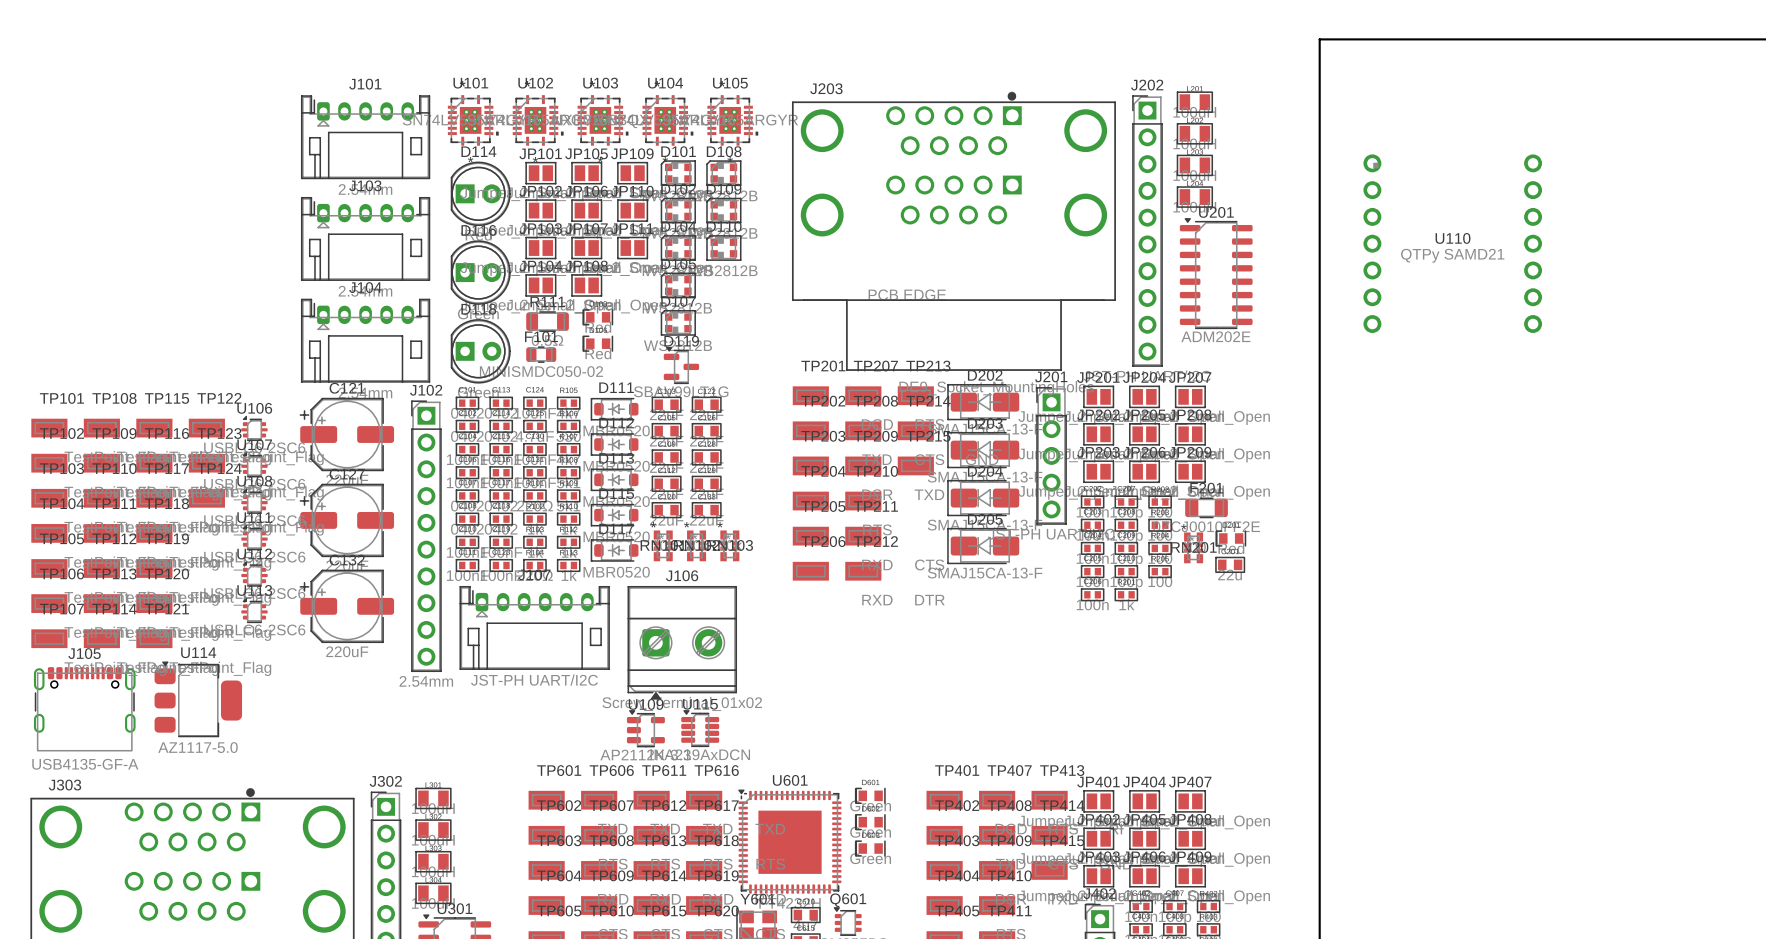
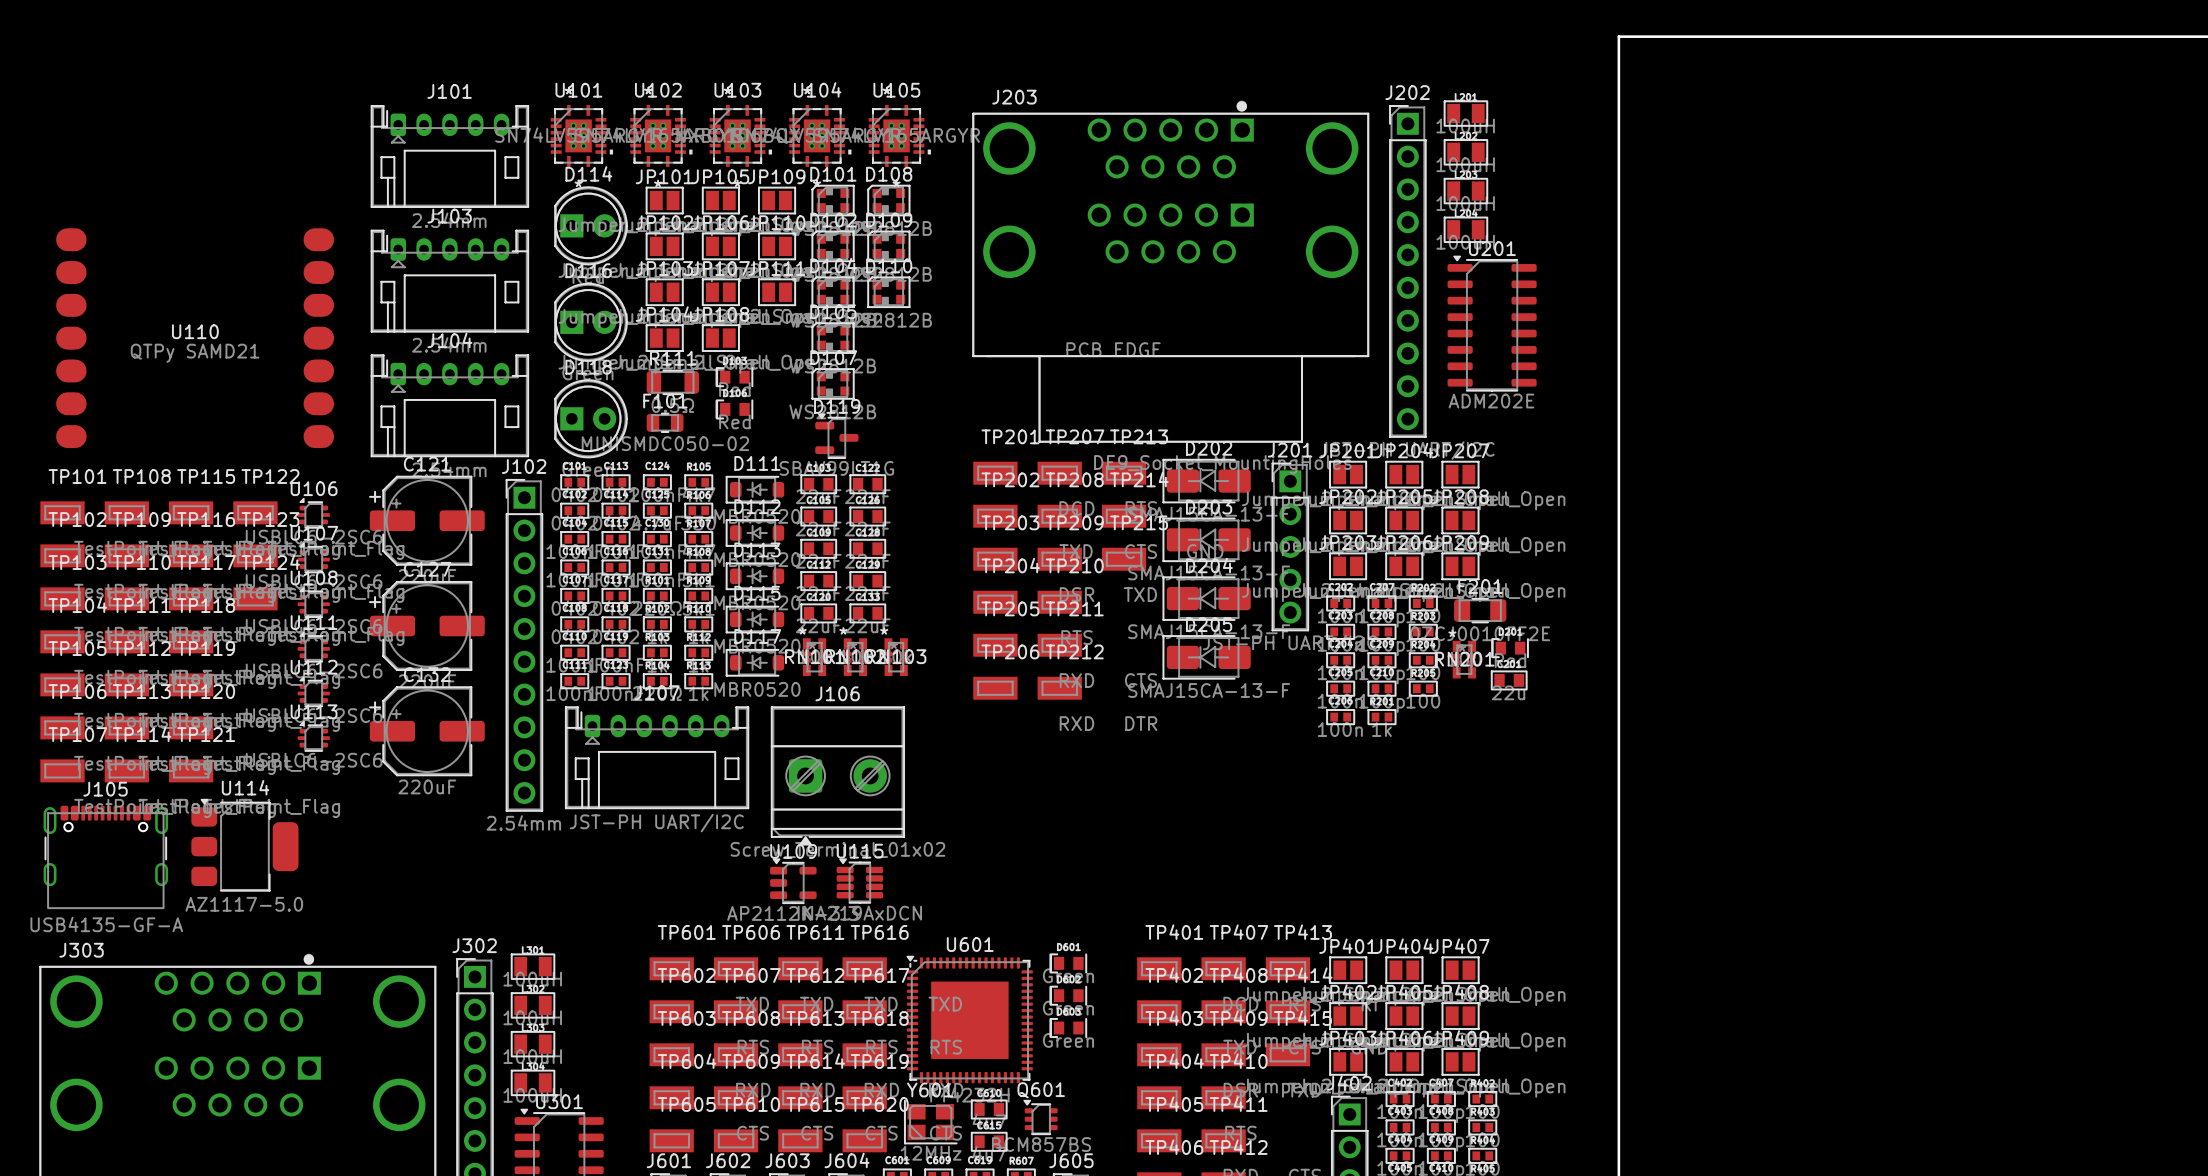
U110 footprint: [1363, 154, 1543, 333] -> [56, 228, 335, 449]

